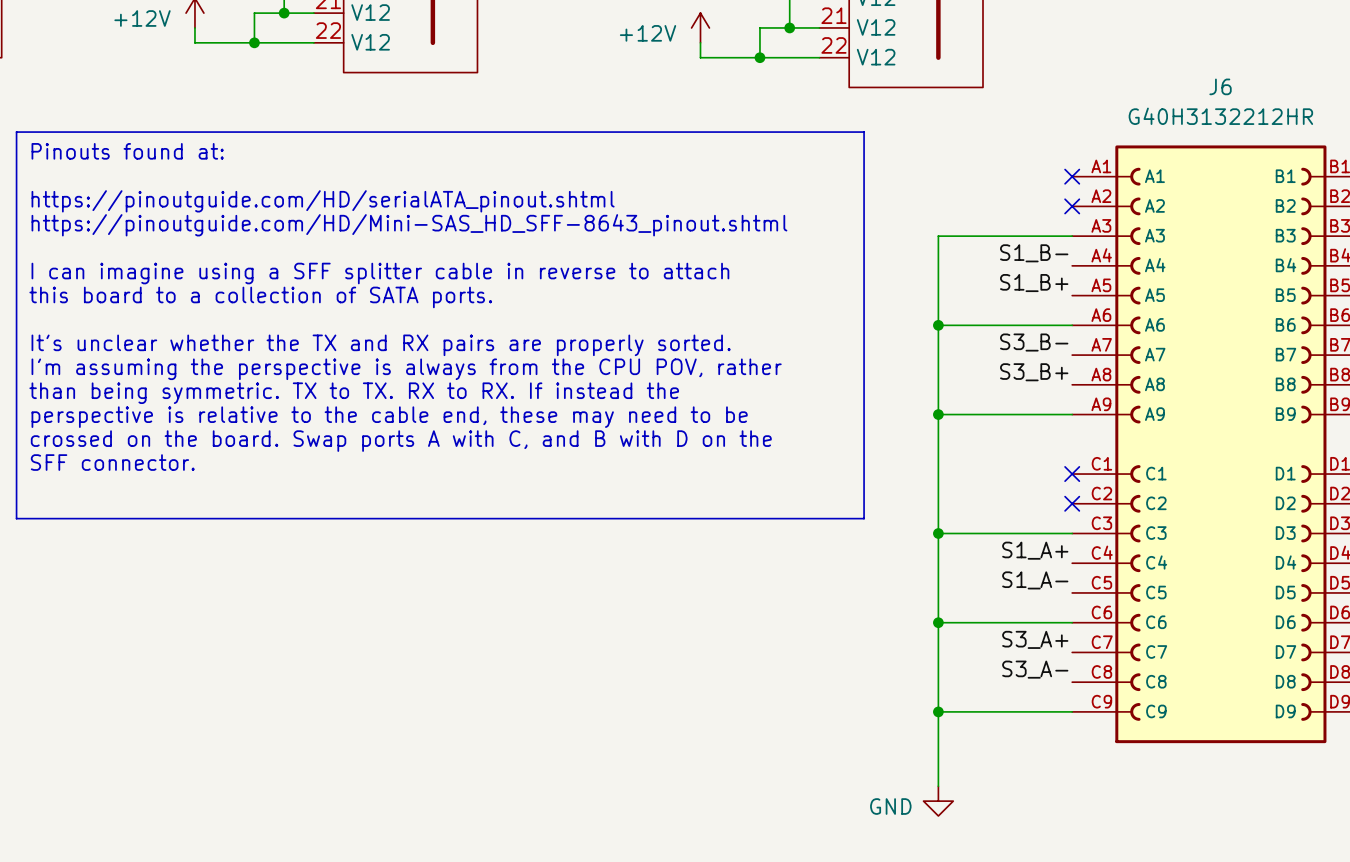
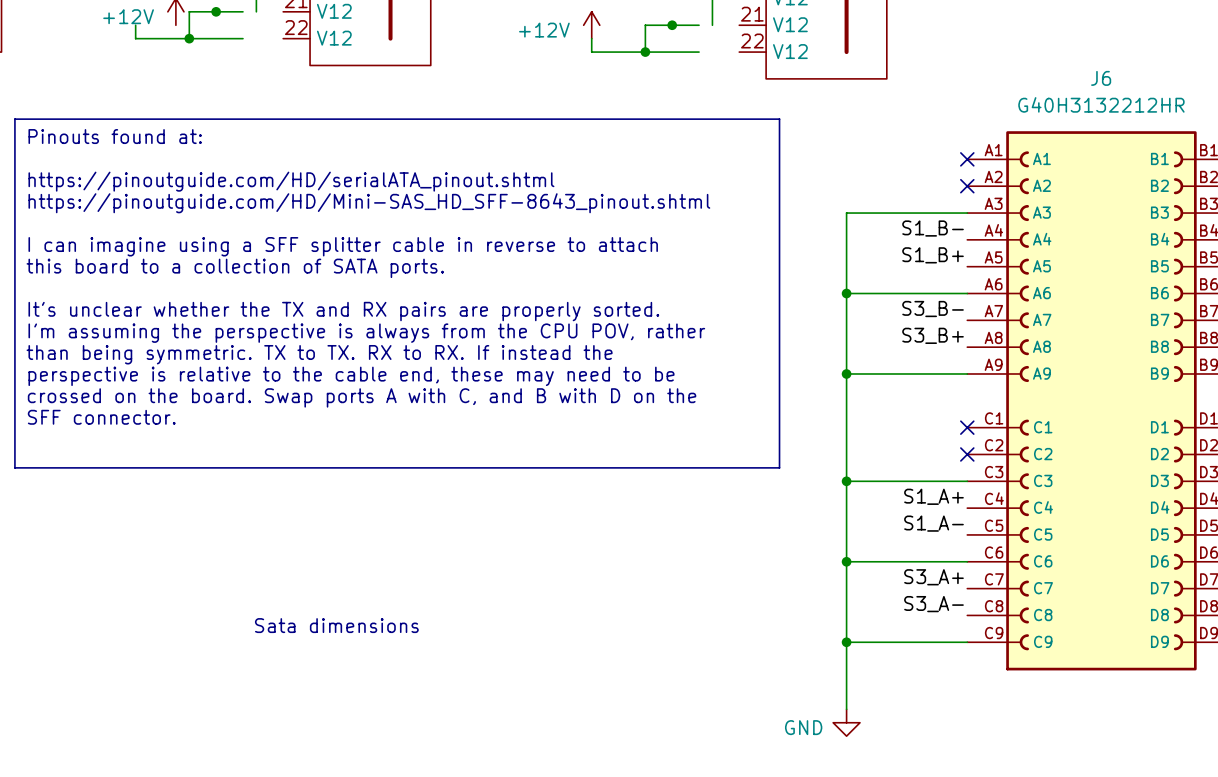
junction: none -> (216, 11)
wire: (254, 13) (254, 42) -> (229, 11) (189, 11) (189, 38)
wire: (269, 13) (313, 13) -> none
junction: (284, 13) -> none
wire: (194, 27) (194, 42) -> (135, 25) (135, 38) (175, 38)
power symbol position: +12V (700, 27) -> +12V (591, 25)
junction: none -> (672, 25)
wire: (759, 27) (759, 57) -> (685, 25) (645, 25) (645, 52)
wire: (774, 27) (819, 27) -> none
junction: (789, 27) -> none
junction: none -> (189, 38)
junction: (254, 42) -> none
wire: (269, 42) (313, 42) -> none
wire: (700, 42) (700, 57) -> (591, 38) (591, 52) (631, 52)
junction: none -> (645, 52)
junction: (759, 57) -> none
wire: (774, 57) (819, 57) -> none
text: none -> Sata dimensions (336, 625)

